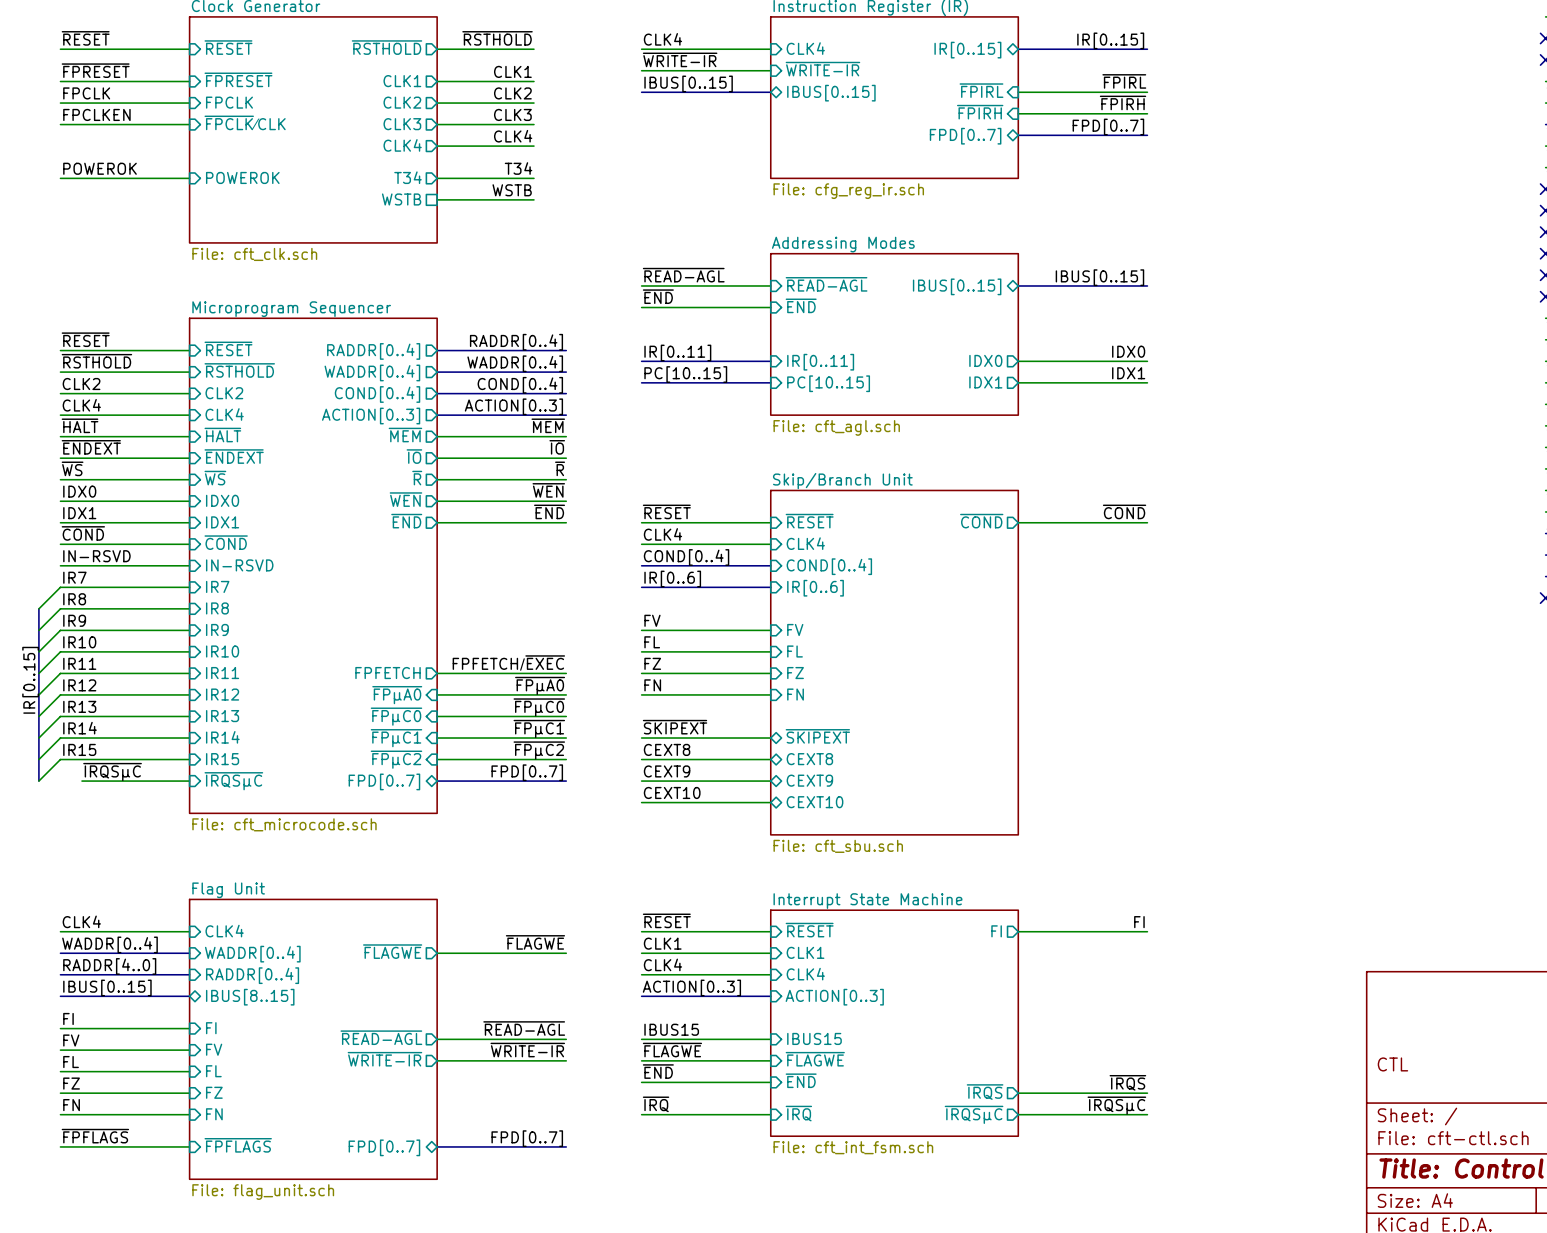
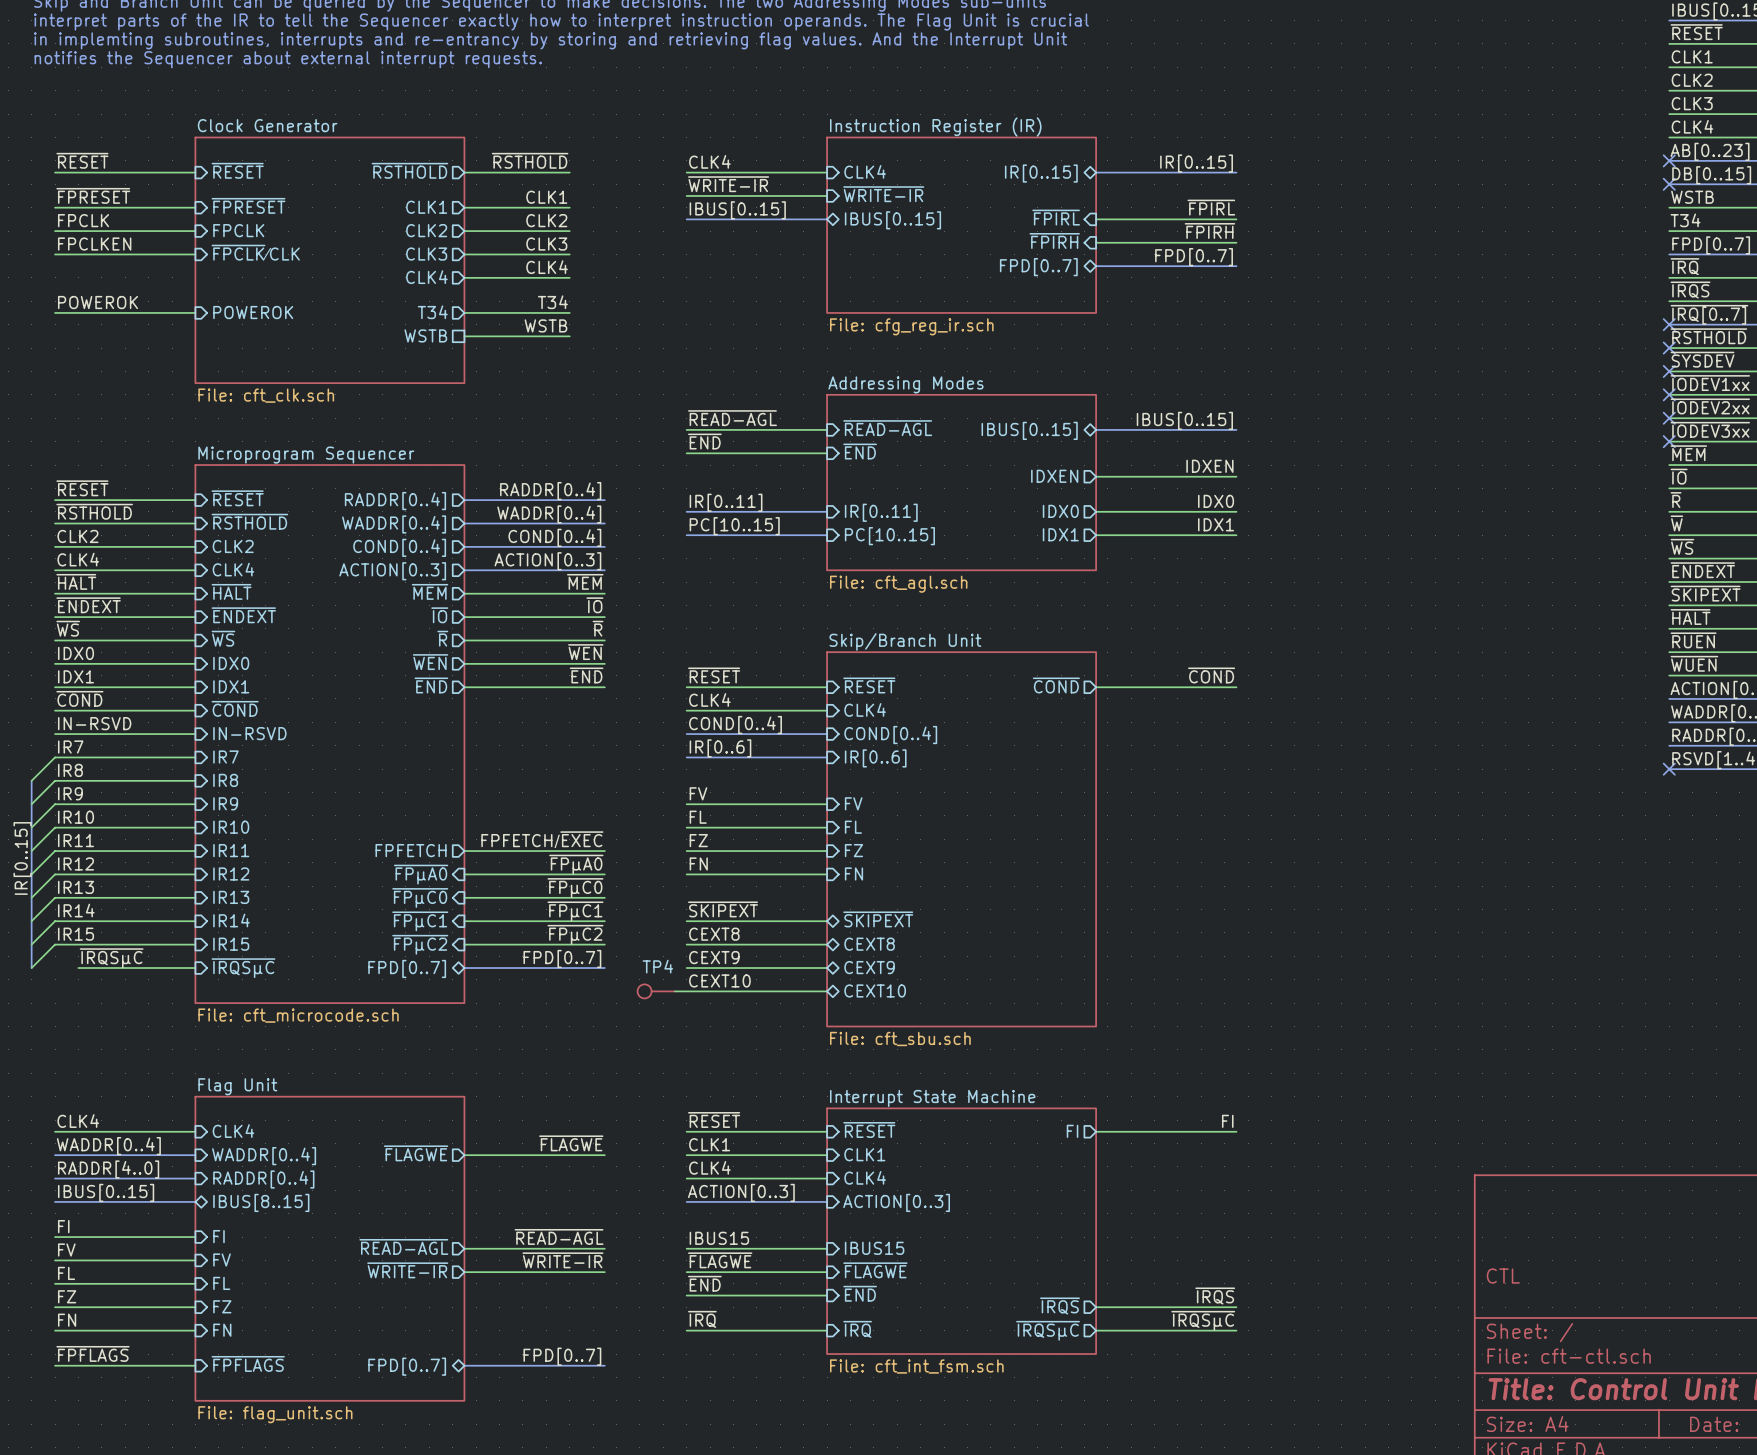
label: none -> IDXEN (1209, 466)
sheet pin: none -> IDXEN (1054, 476)
wire: none -> (1096, 476) (1236, 476)
TP4: none -> (656, 991)
wire: none -> (674, 991) (686, 991)

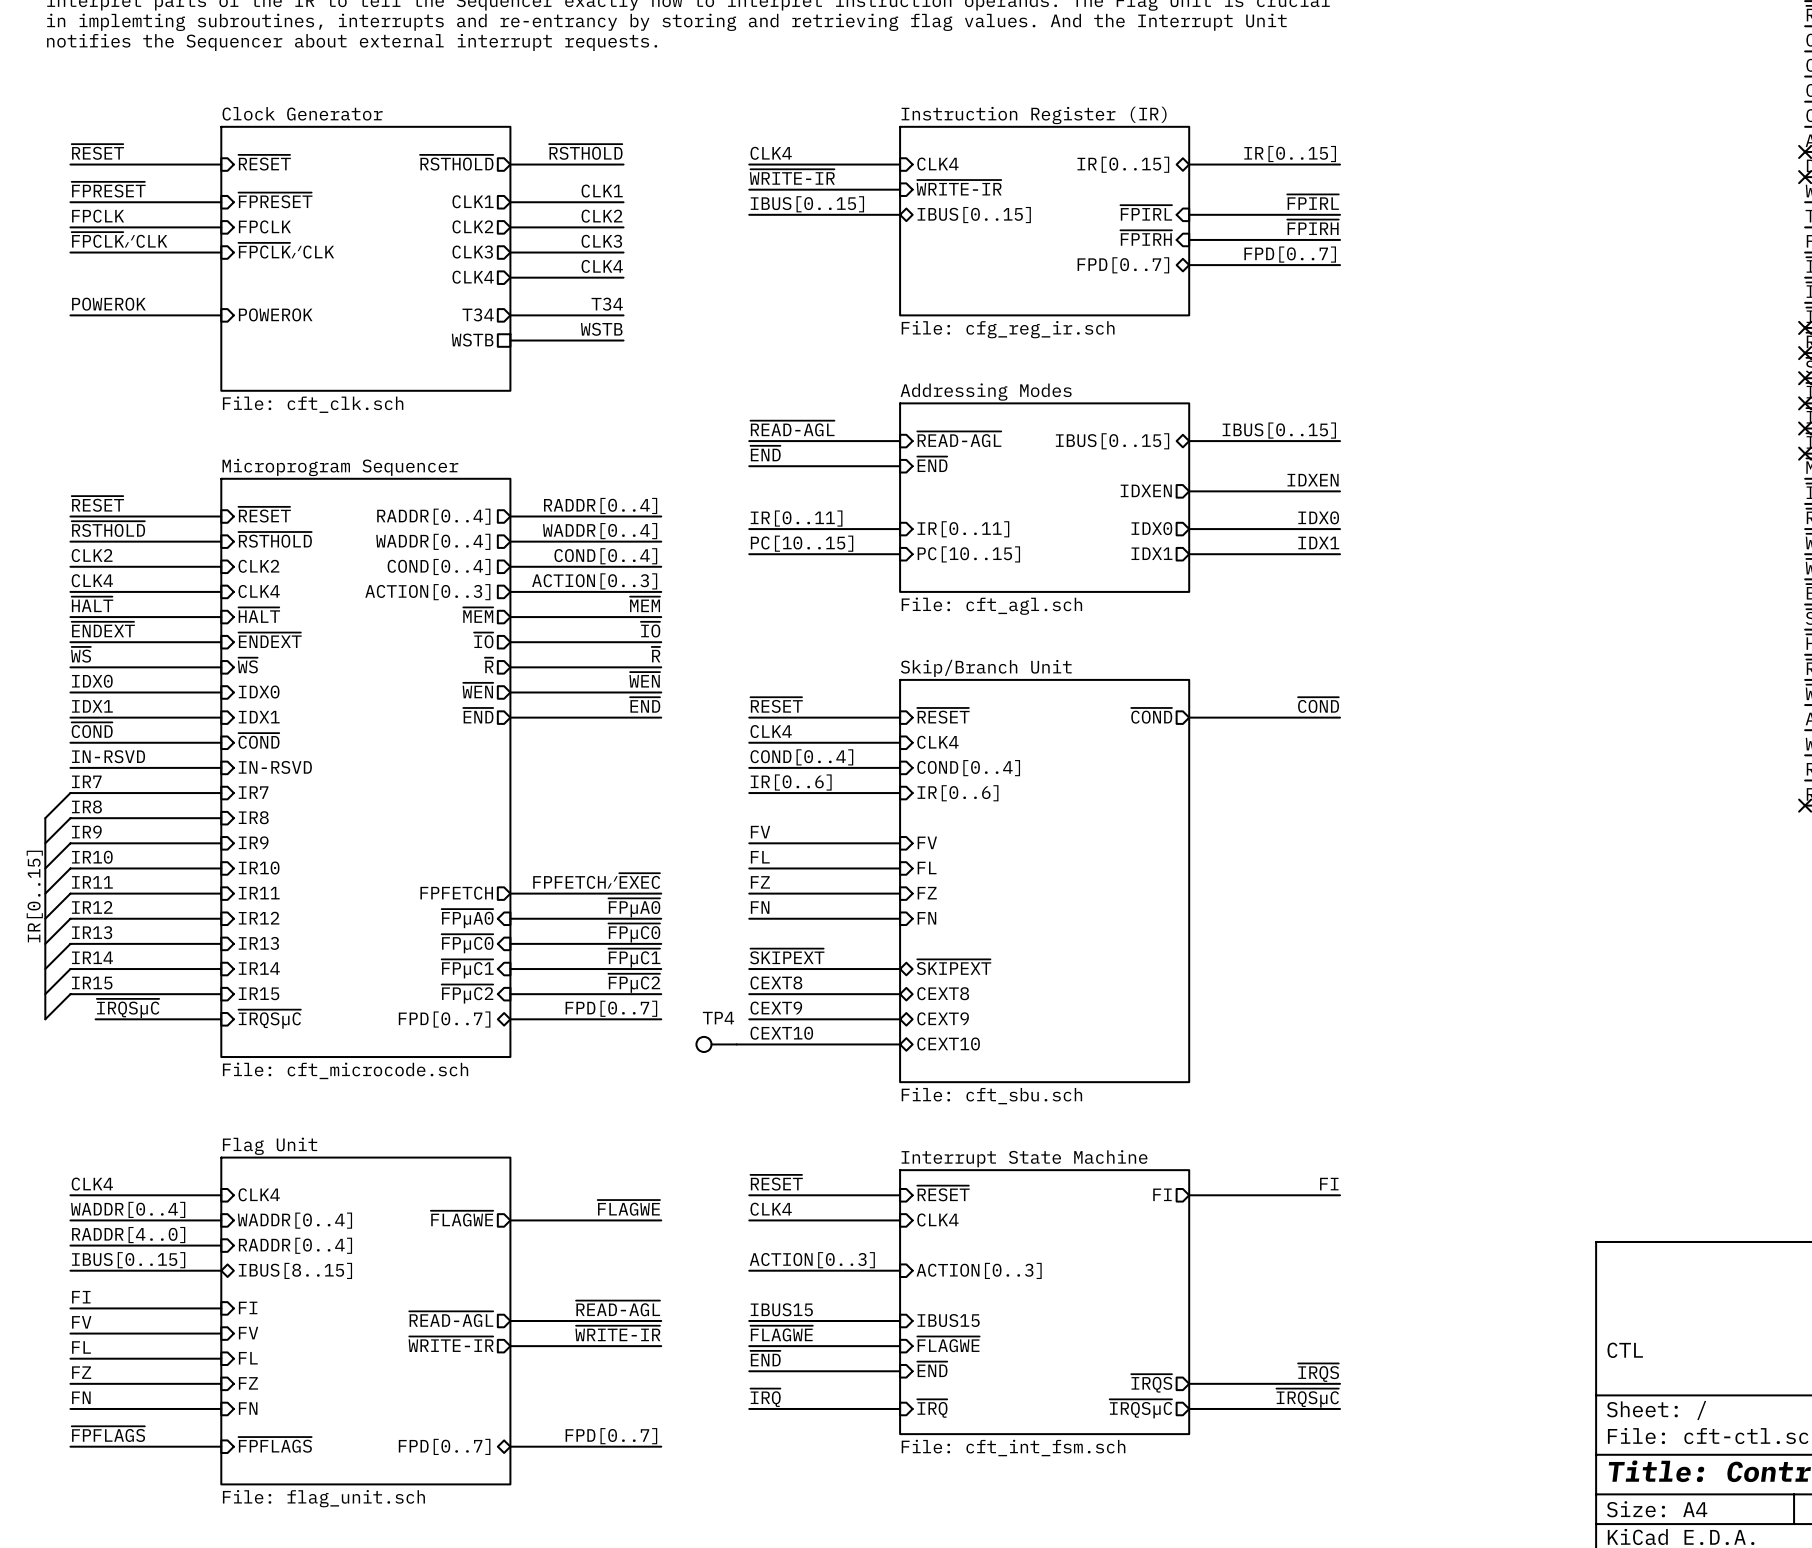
label: FPCLKEN (94, 244) -> ~{FPCLK}⁄CLK (119, 239)
label: CLK1 (709, 1144) -> CLK4 (771, 1209)
sheet pin: CLK1 (864, 1154) -> CLK4 (937, 1219)
label: CLK4 (709, 1167) -> none
sheet pin: CLK4 (865, 1177) -> none
wire: (686, 1178) (827, 1178) -> none

